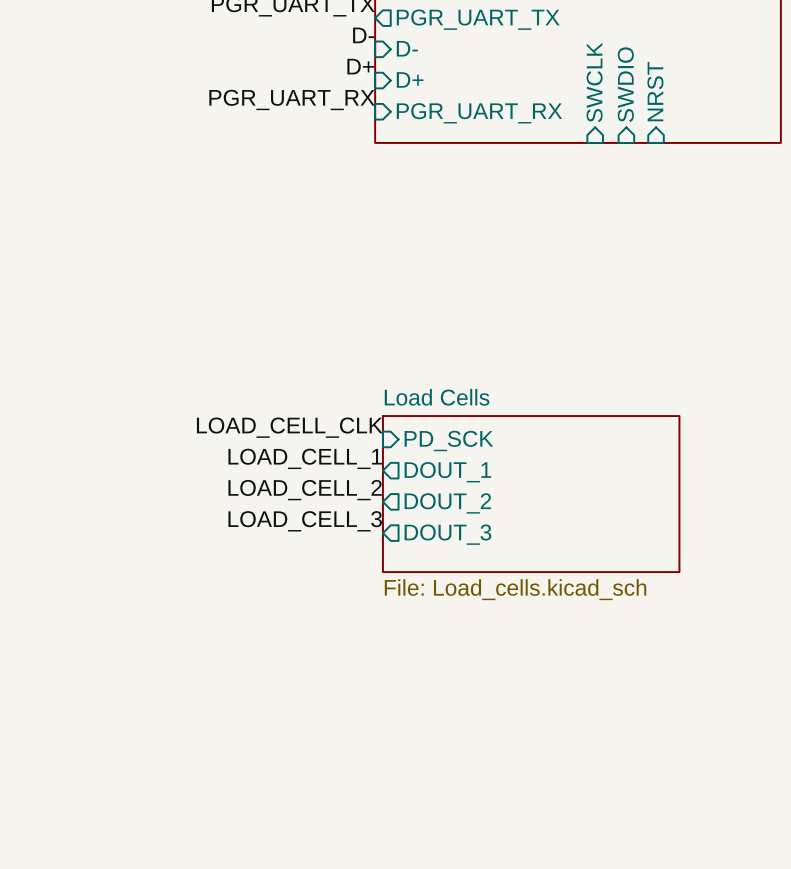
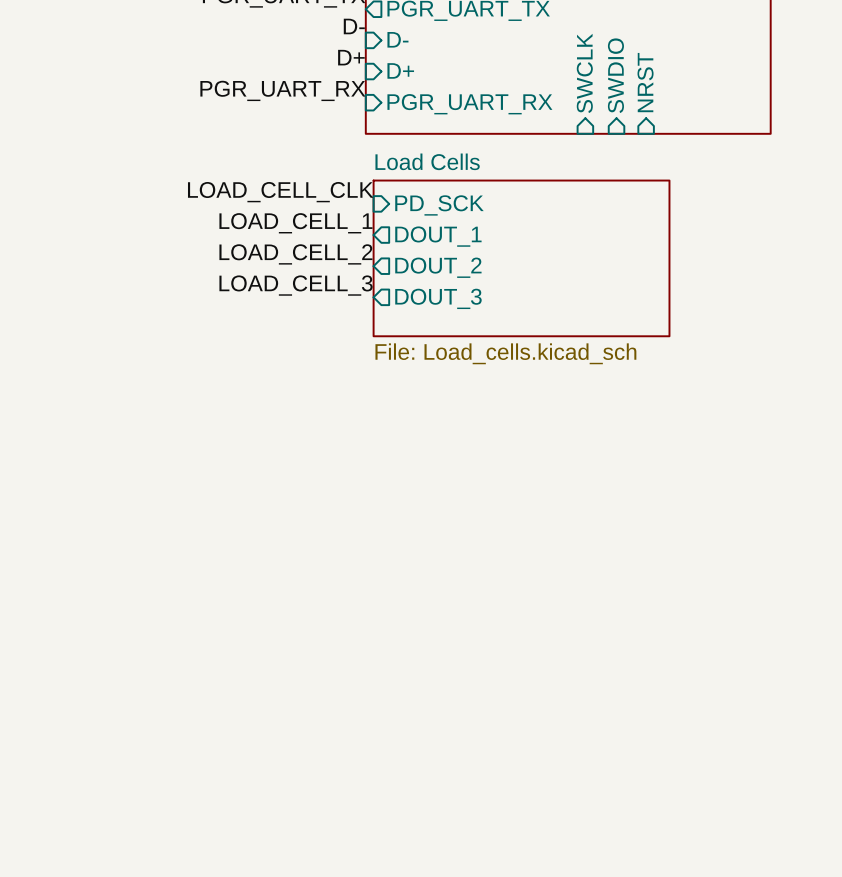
label position: LOAD_CELL_CLK (289, 427) -> LOAD_CELL_CLK (280, 192)
sheet pin position: PD_SCK (448, 441) -> PD_SCK (439, 205)
label position: LOAD_CELL_1 (305, 458) -> LOAD_CELL_1 (295, 223)
sheet pin position: DOUT_1 (447, 472) -> DOUT_1 (438, 236)
label position: LOAD_CELL_2 (305, 490) -> LOAD_CELL_2 (295, 254)
sheet Load Cells position: (531, 494) -> (521, 258)
sheet pin position: DOUT_2 (447, 503) -> DOUT_2 (438, 267)
label position: LOAD_CELL_3 (305, 521) -> LOAD_CELL_3 (296, 285)
sheet pin position: DOUT_3 (447, 534) -> DOUT_3 (438, 298)

